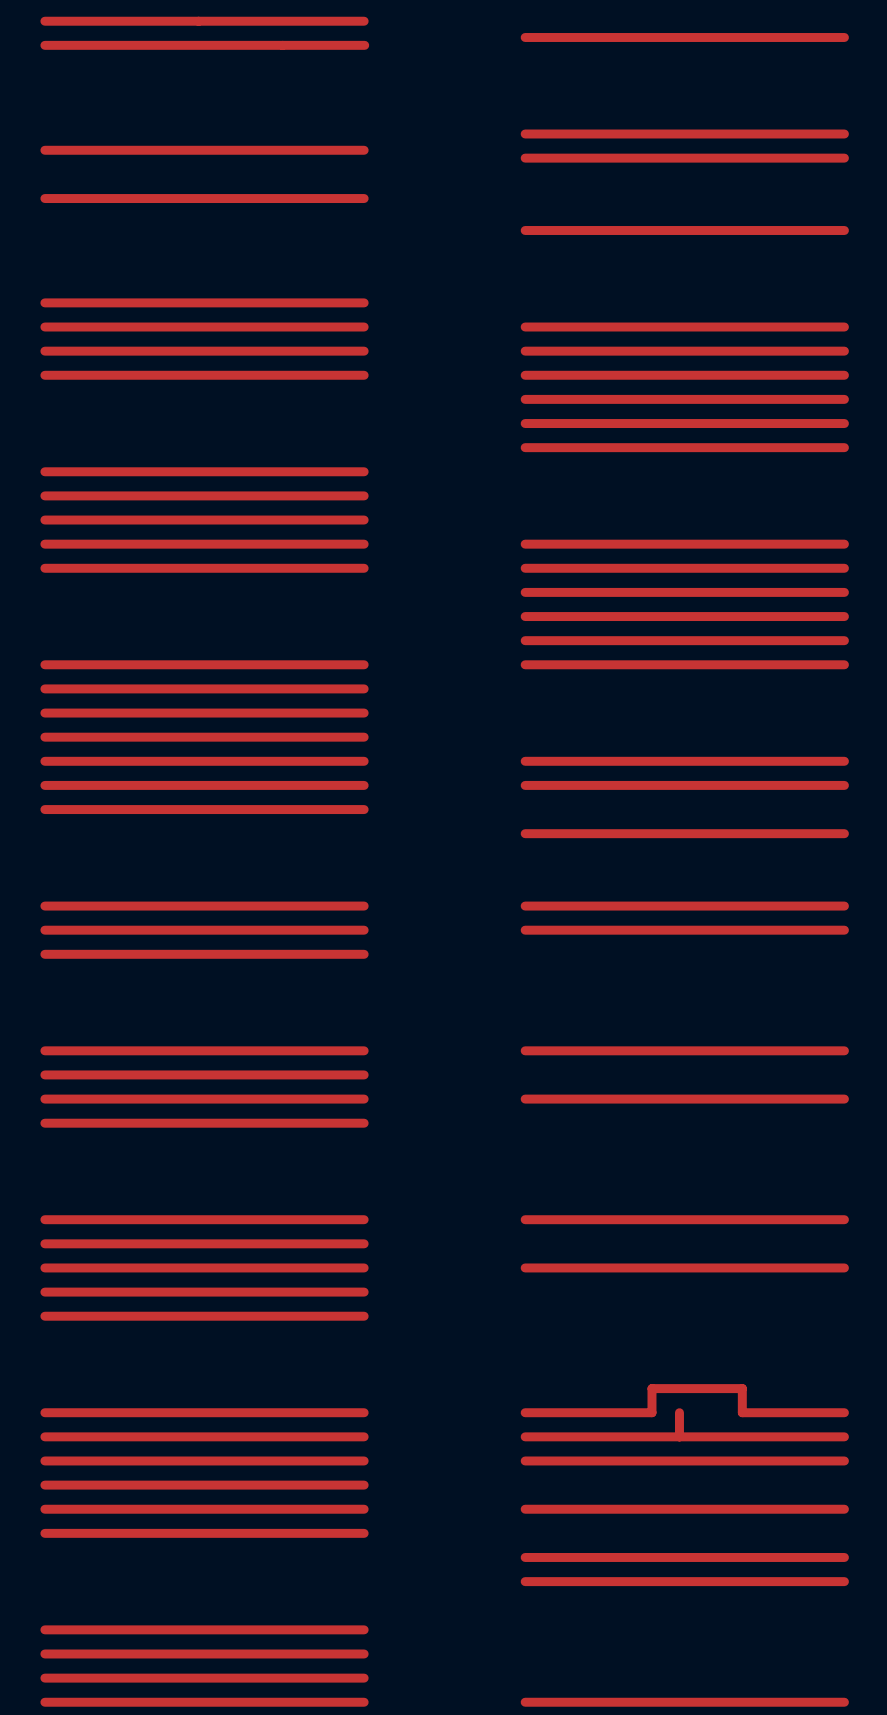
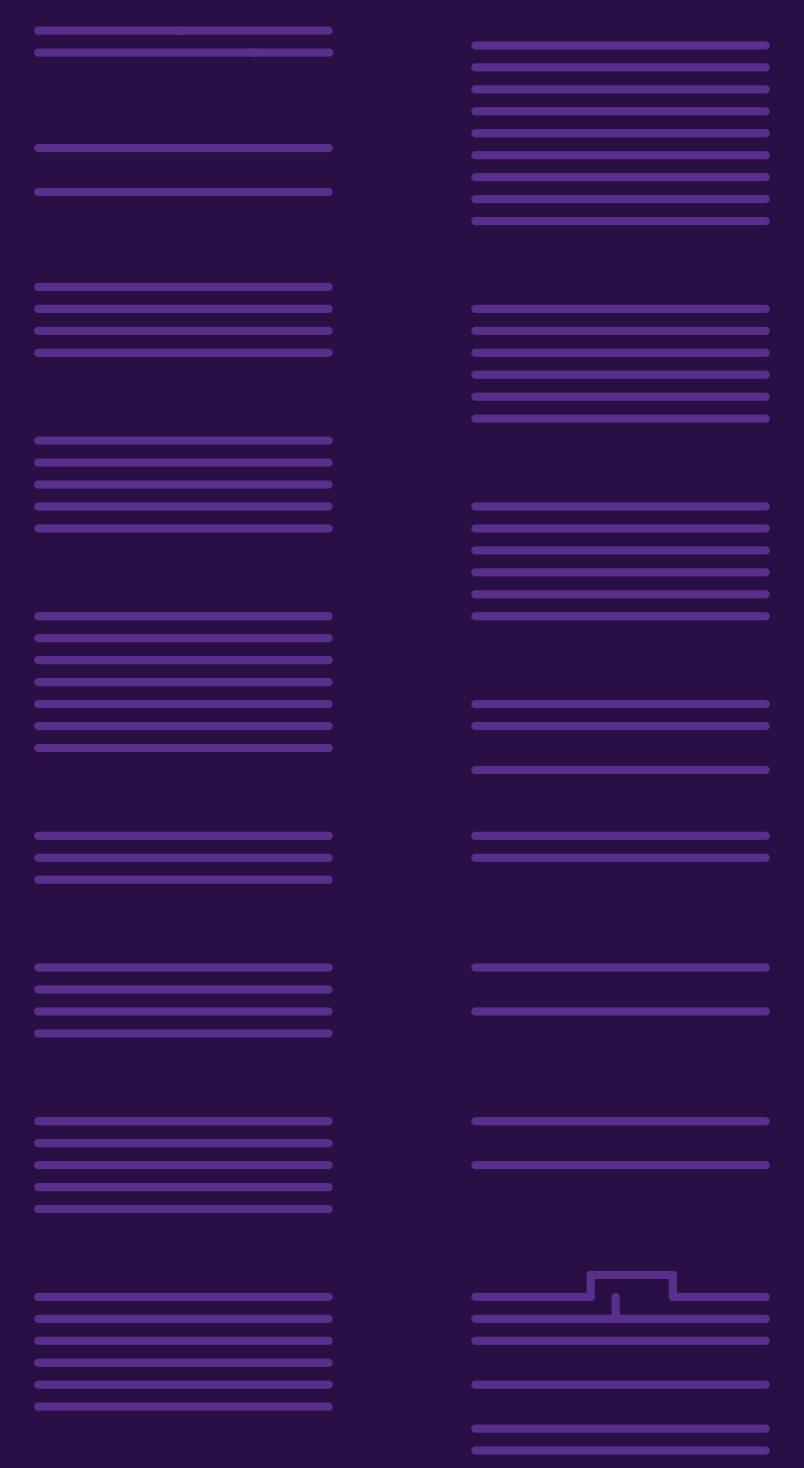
track: none -> (475, 67) (765, 67)
track: none -> (475, 89) (765, 89)
track: none -> (475, 111) (765, 111)
track: none -> (475, 177) (765, 177)
track: none -> (475, 199) (765, 199)

